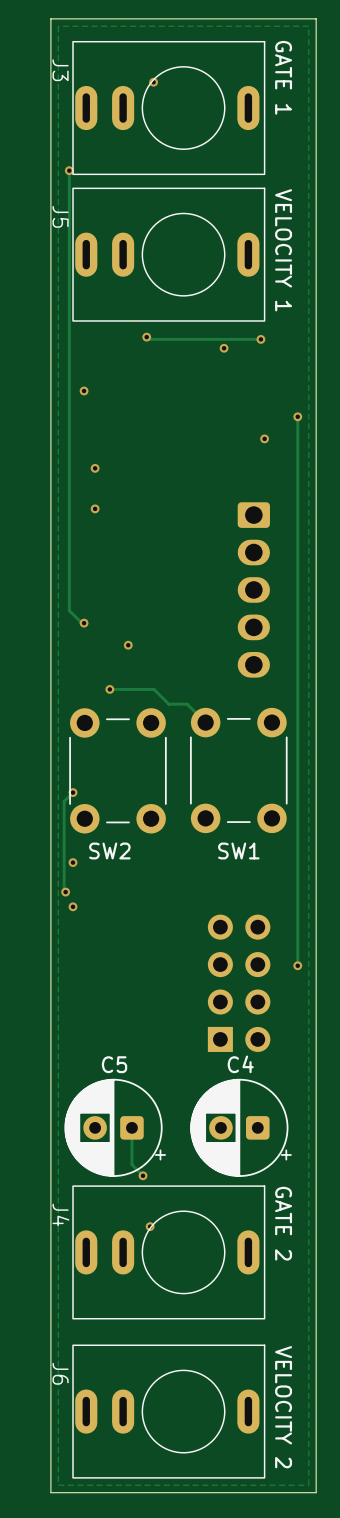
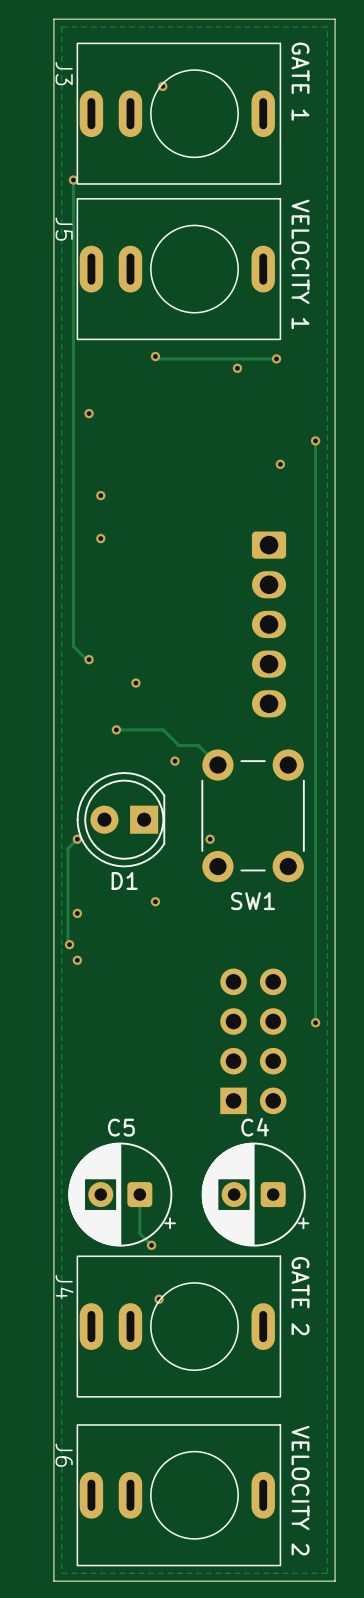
via: none -> (174, 761)
SW2: (117, 770) -> none
D1: none -> (120, 819)
via: none -> (210, 839)
via: none -> (155, 901)

